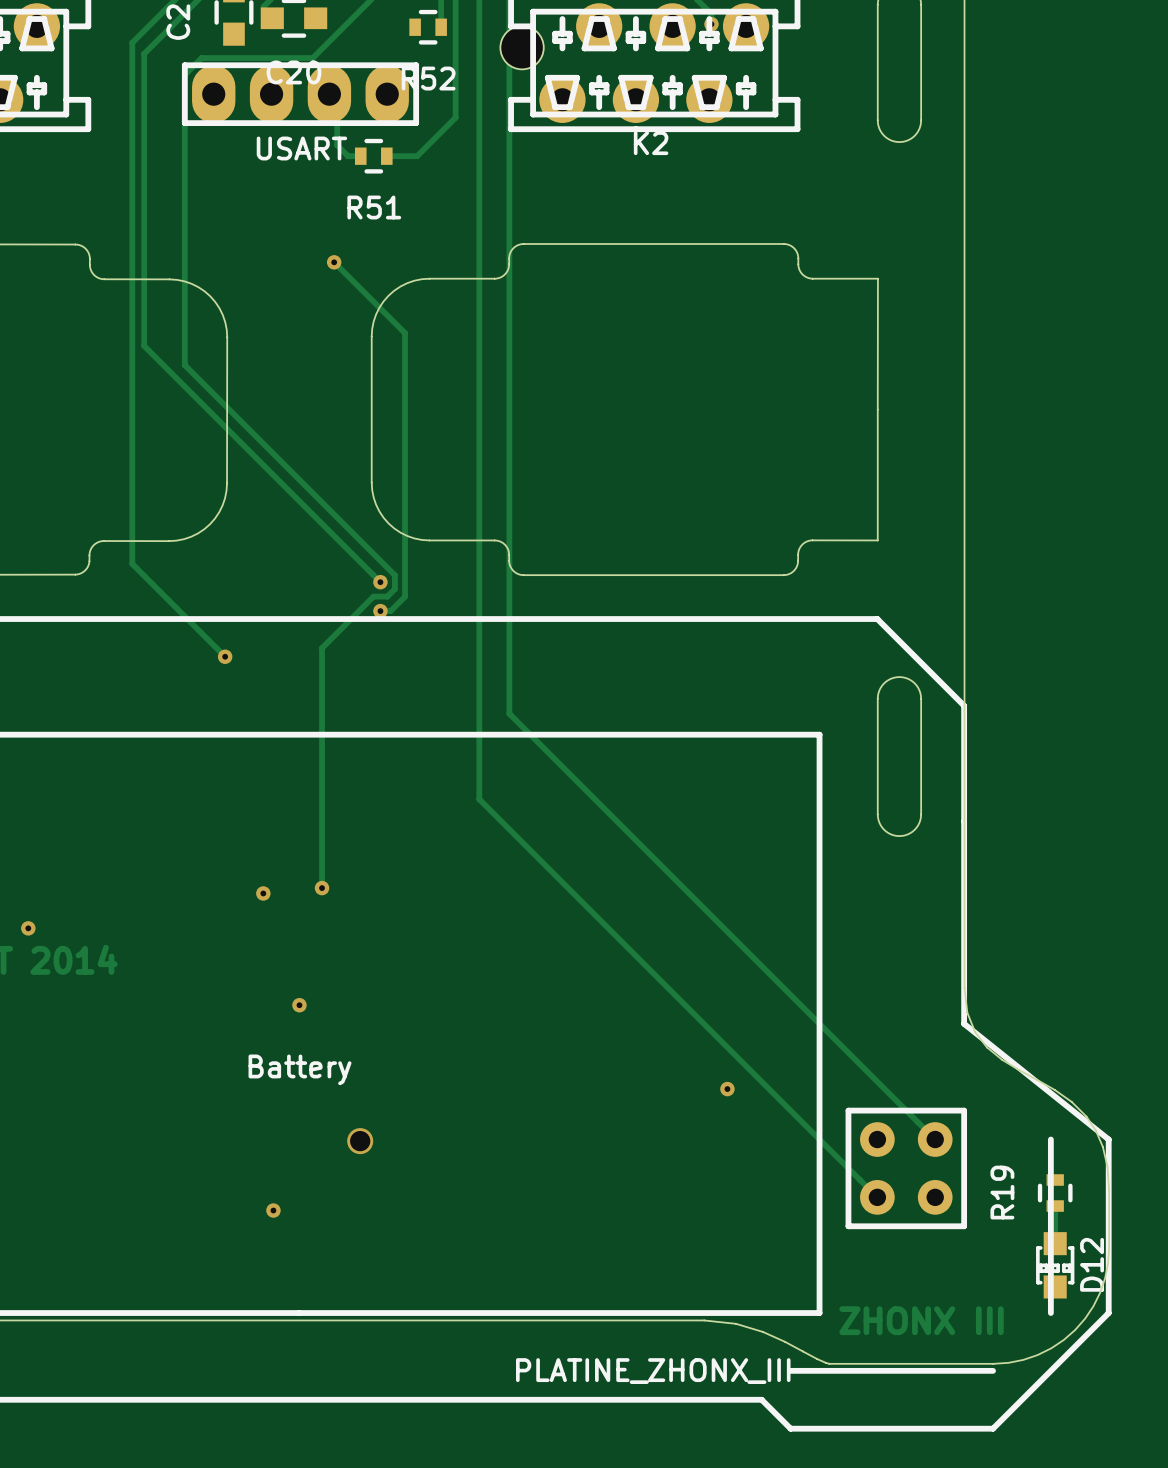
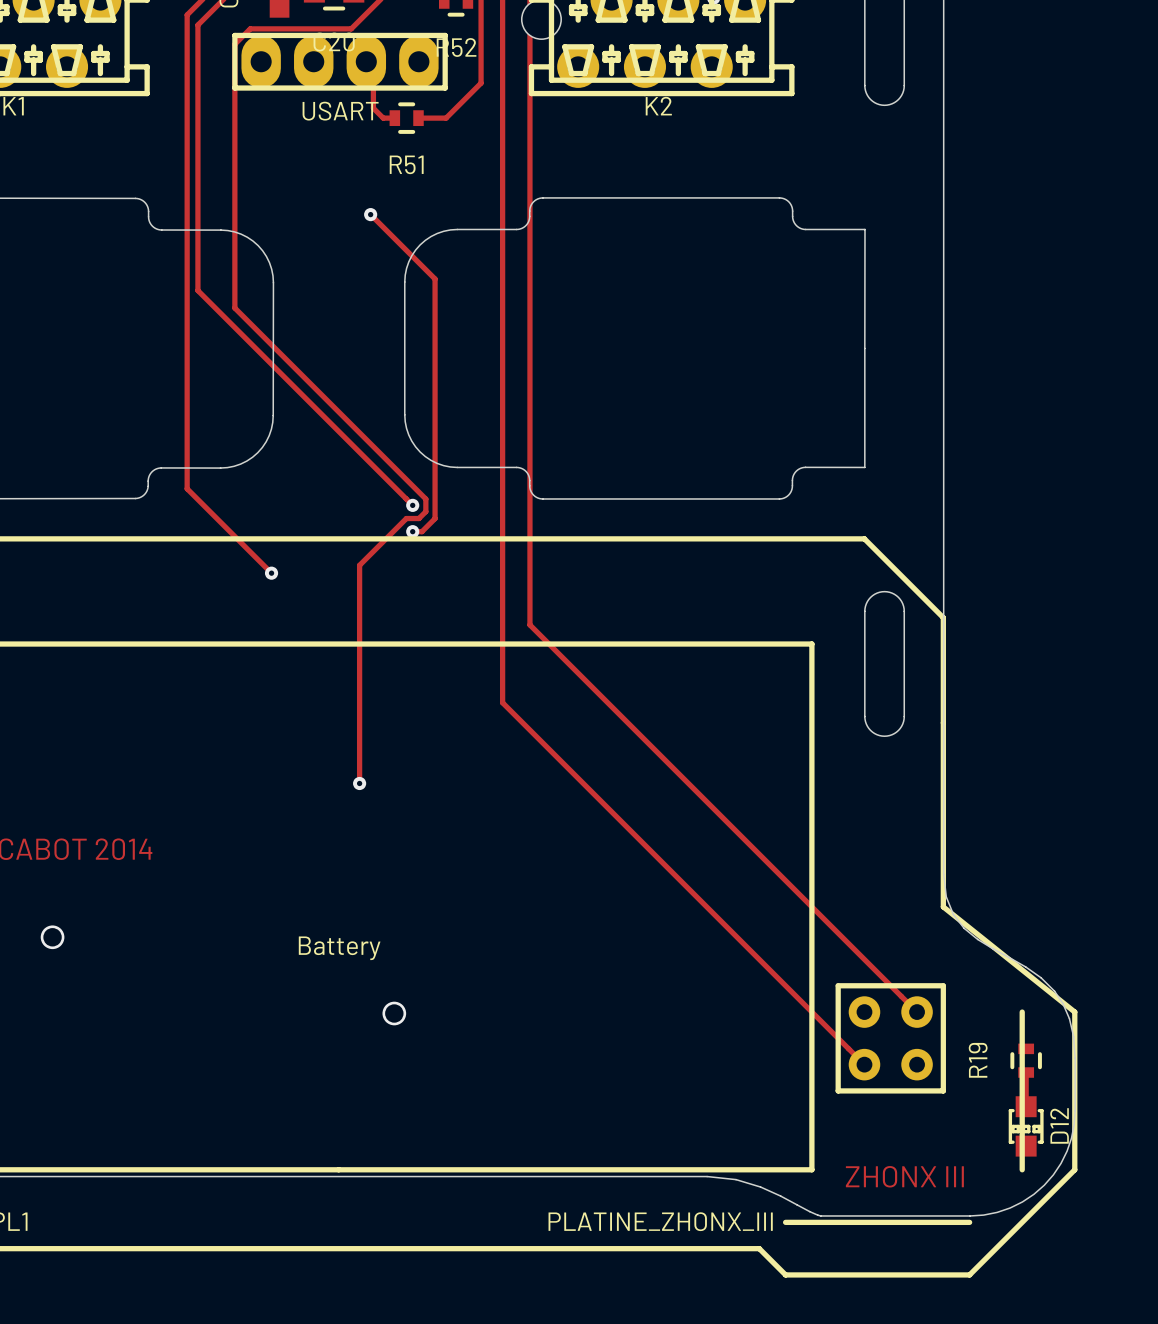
via: (263, 893) -> none
via: (28, 928) -> none
via: (299, 1005) -> none
via: (727, 1089) -> none
via: (273, 1210) -> none

